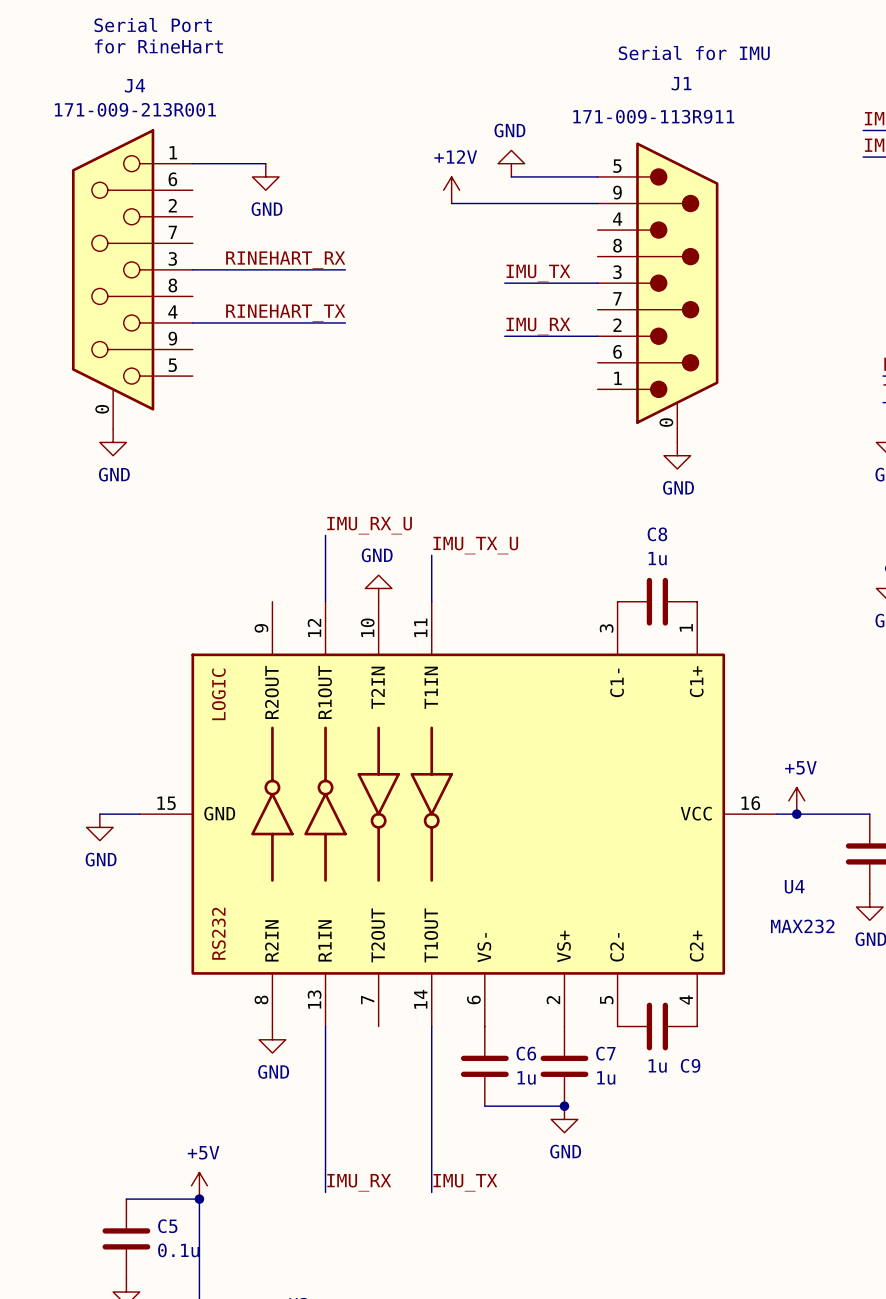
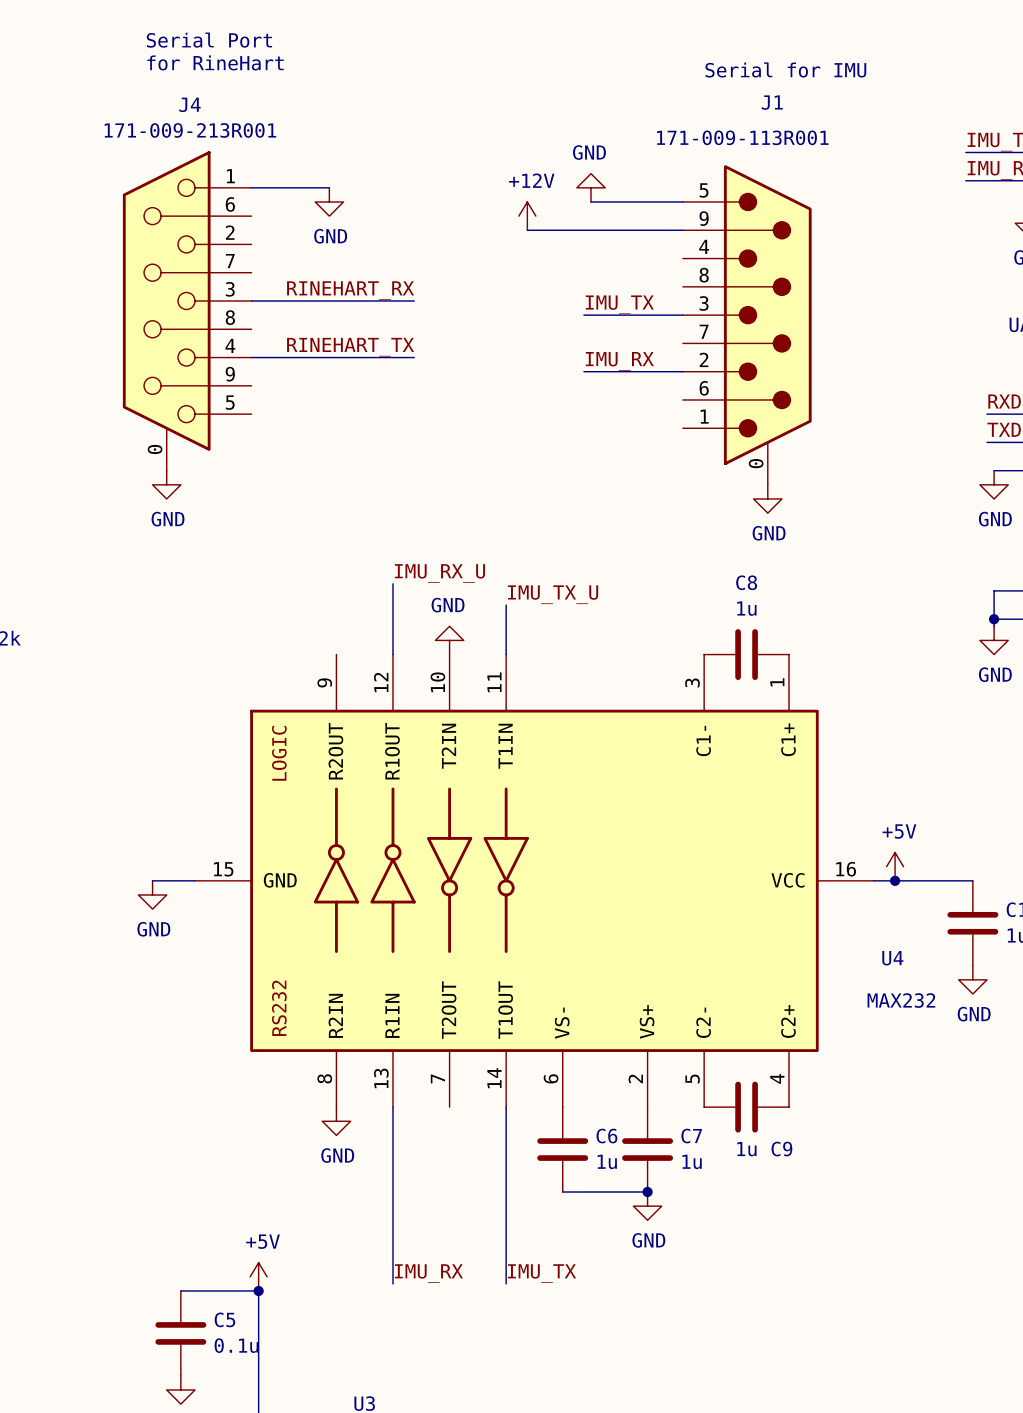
J1 value: 171-009-113R911 (653, 116) -> 171-009-113R001 (742, 137)

